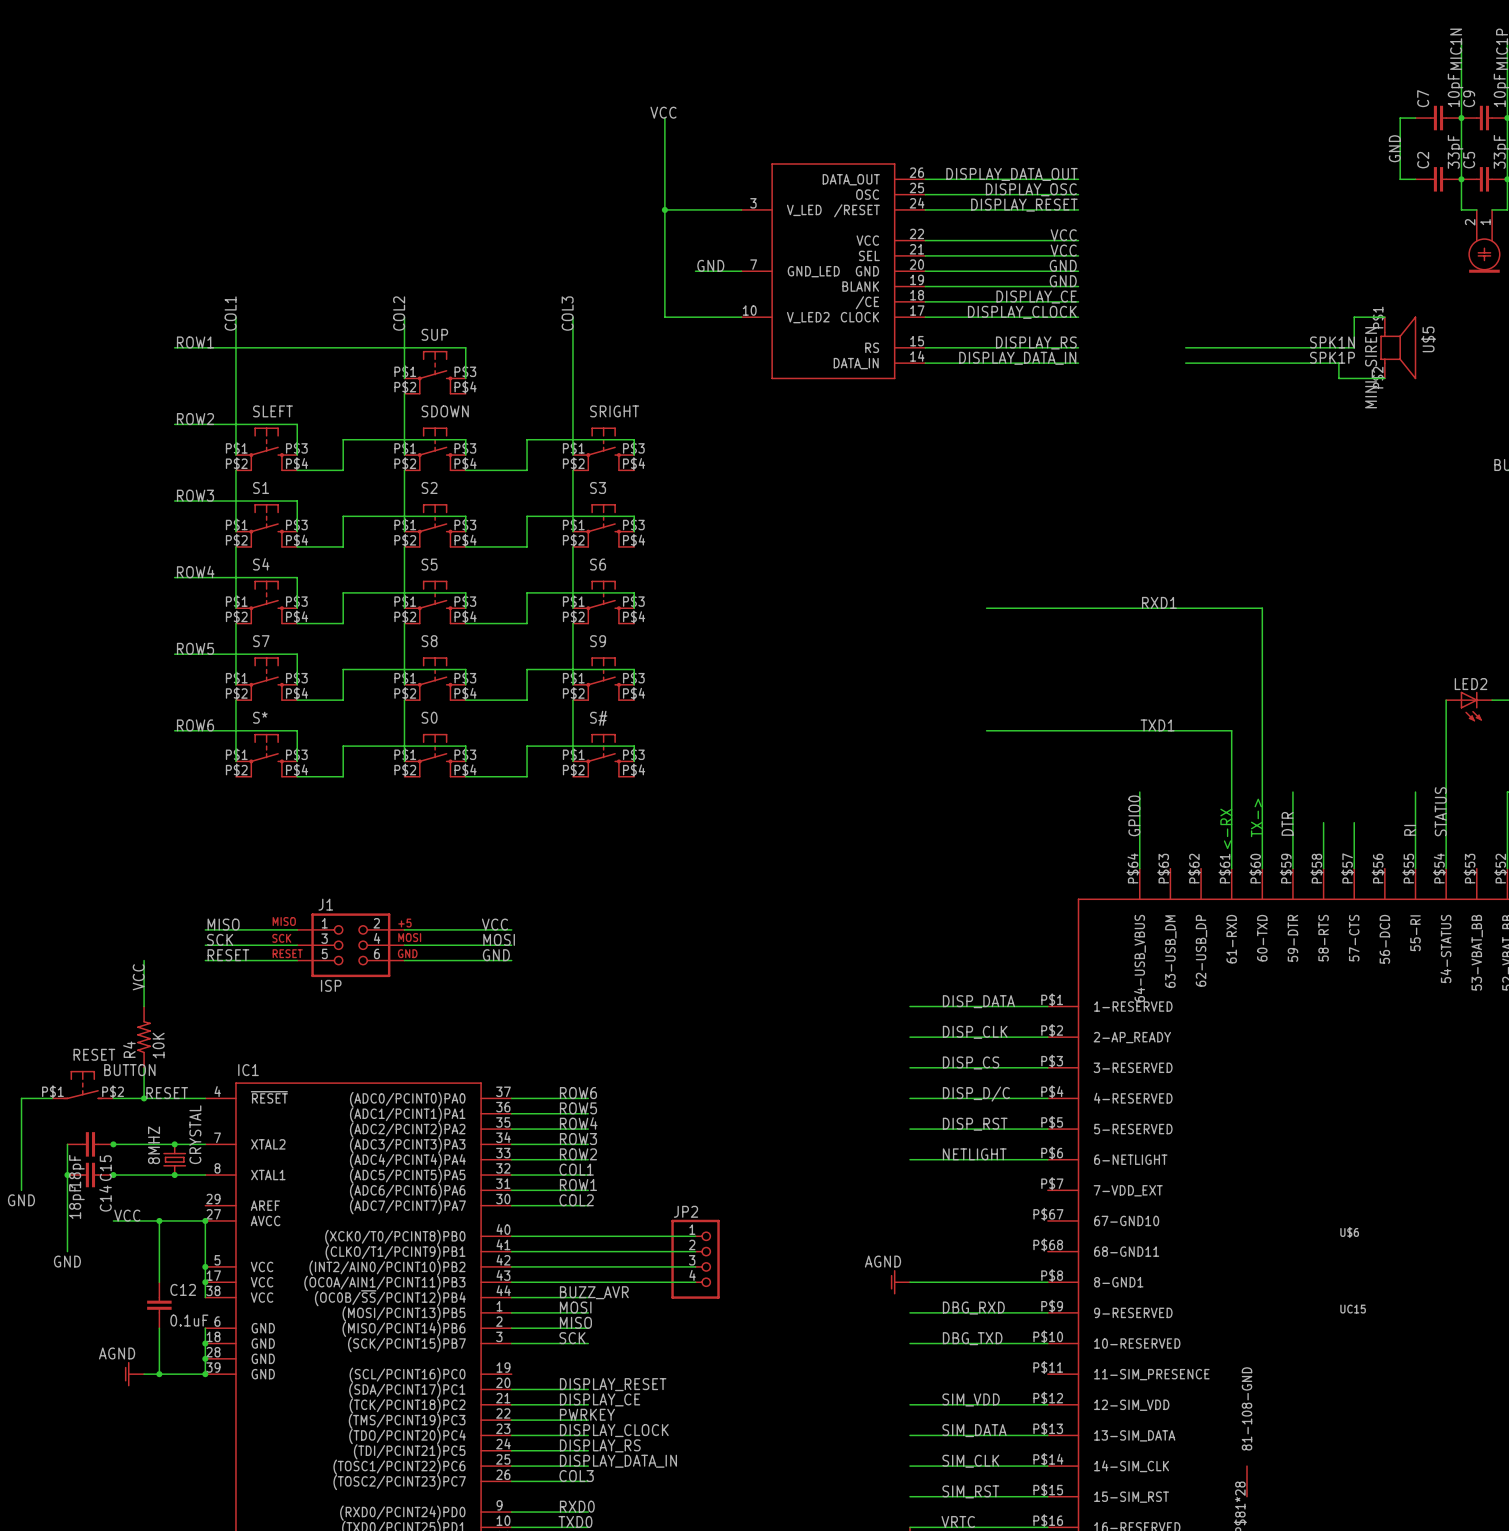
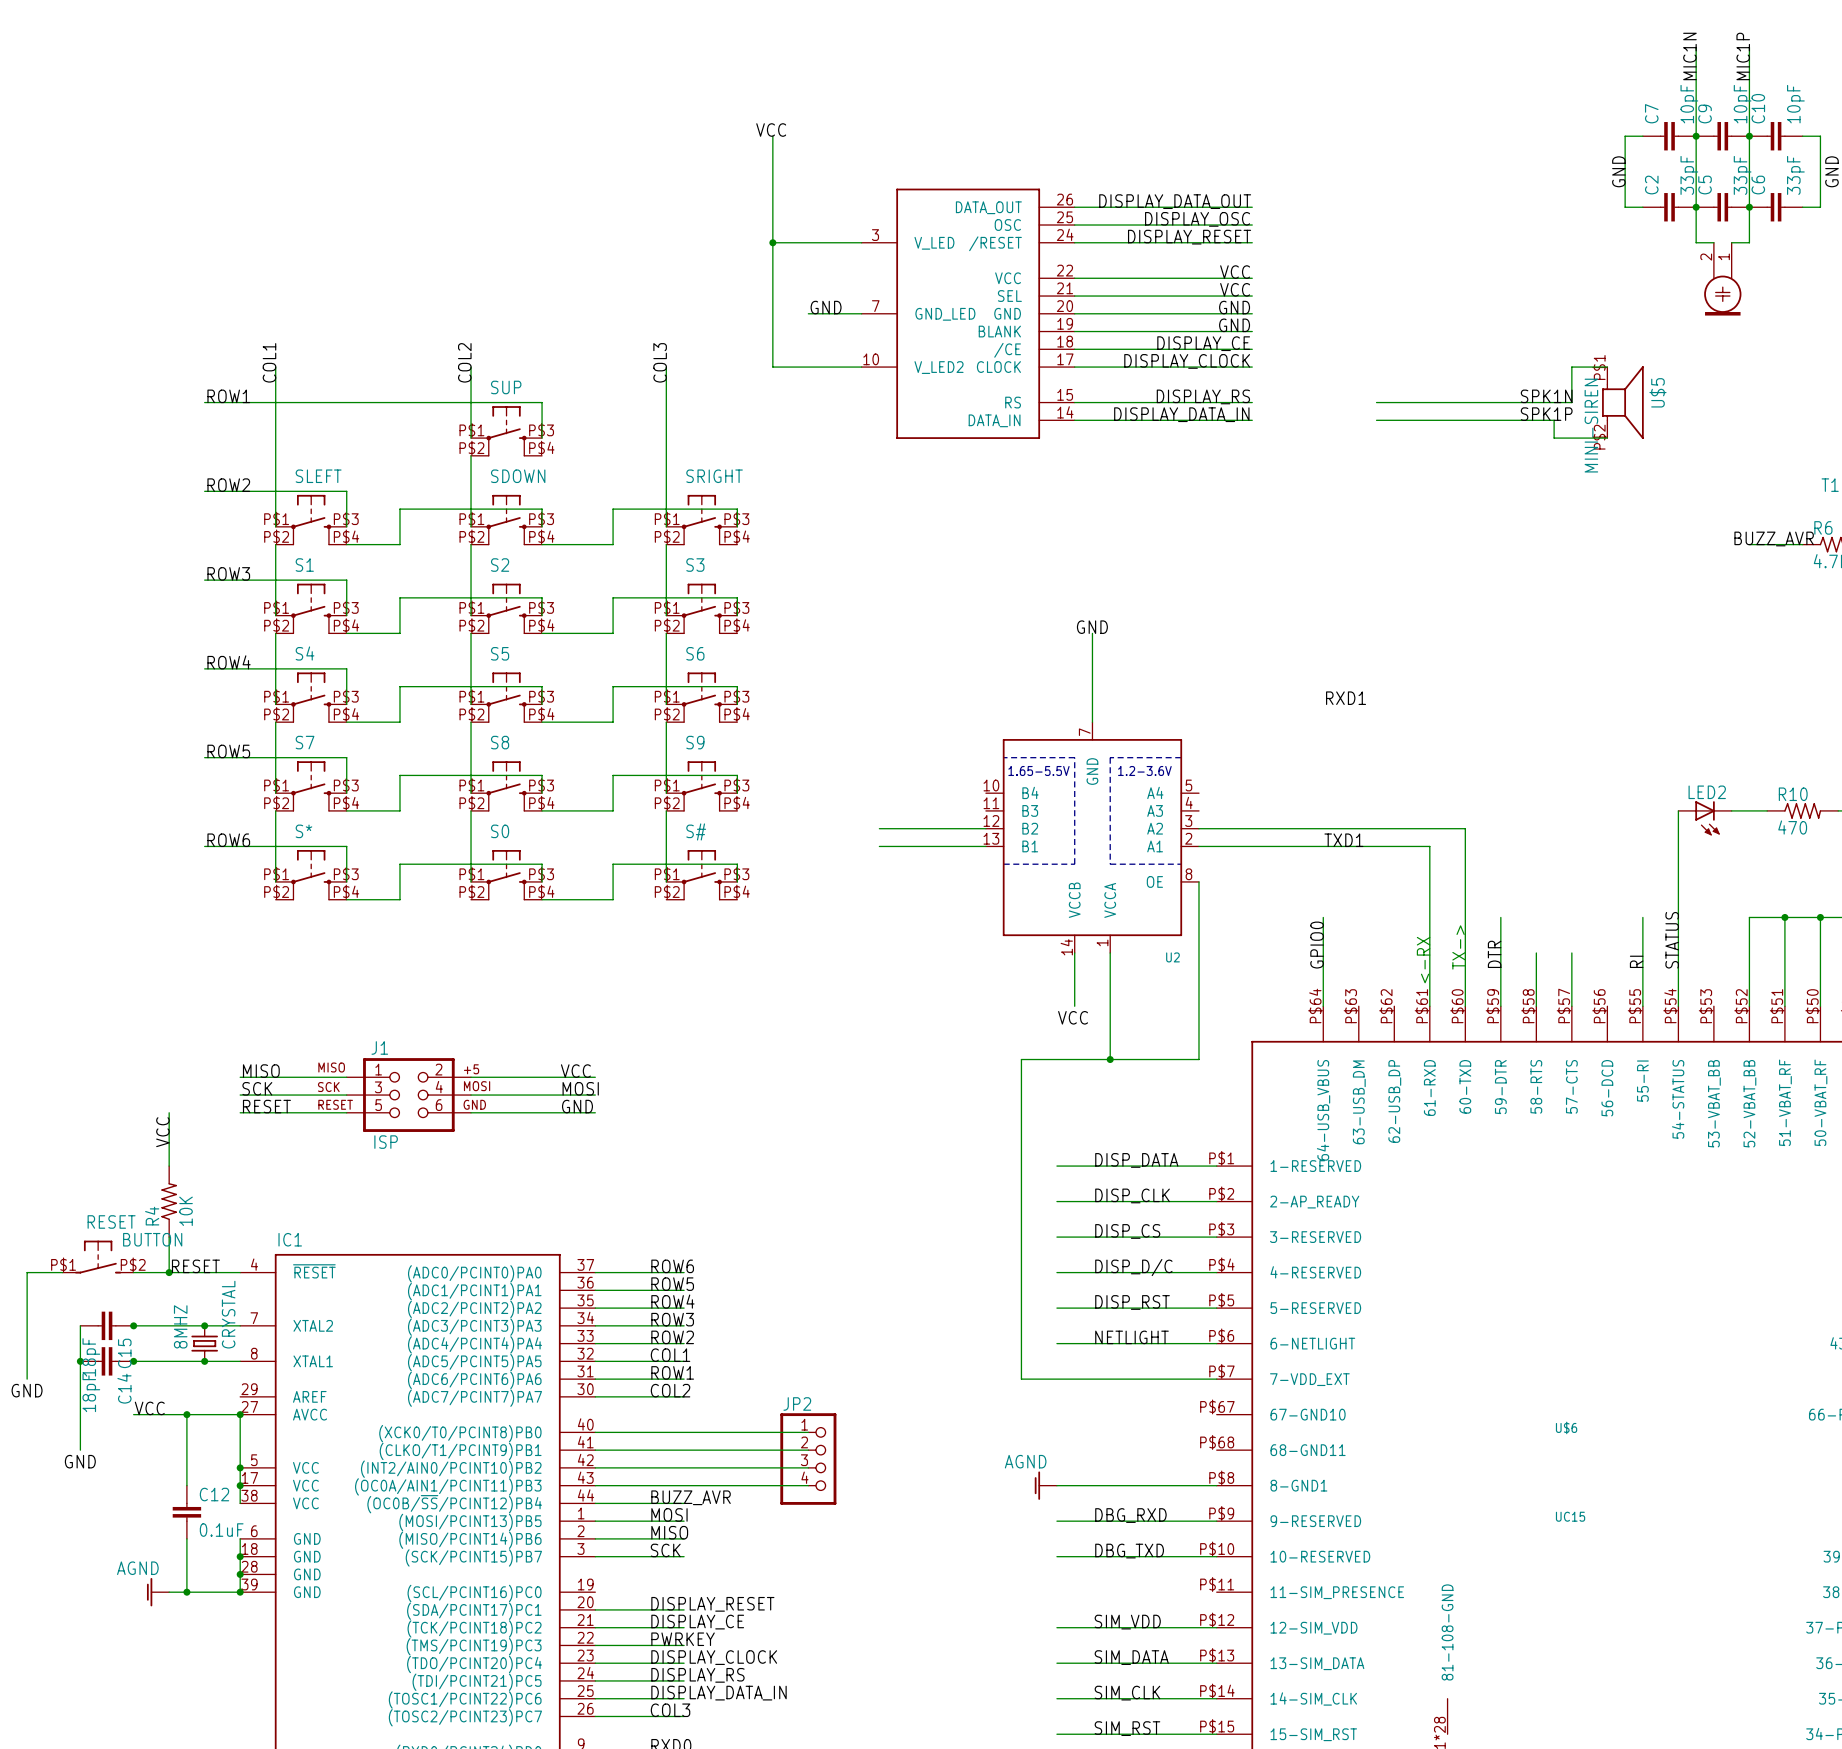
label: none -> GND (1092, 627)
wire: none -> (1092, 633) (1092, 722)
wire: (986, 608) (1262, 608) (1262, 715) -> (1198, 828) (1465, 828)
wire: none -> (879, 828) (985, 828)
U2: none -> (1092, 837)
wire: none -> (879, 846) (985, 846)
wire: (986, 730) (1032, 730) -> none
wire: none -> (1198, 881) (1198, 1059) (1021, 1059) (1021, 1379) (1216, 1379)
wire: none -> (1074, 952) (1074, 1006)
wire: none -> (1110, 952) (1110, 1059)
label: none -> VCC (1073, 1017)
junction: none -> (1110, 1059)

